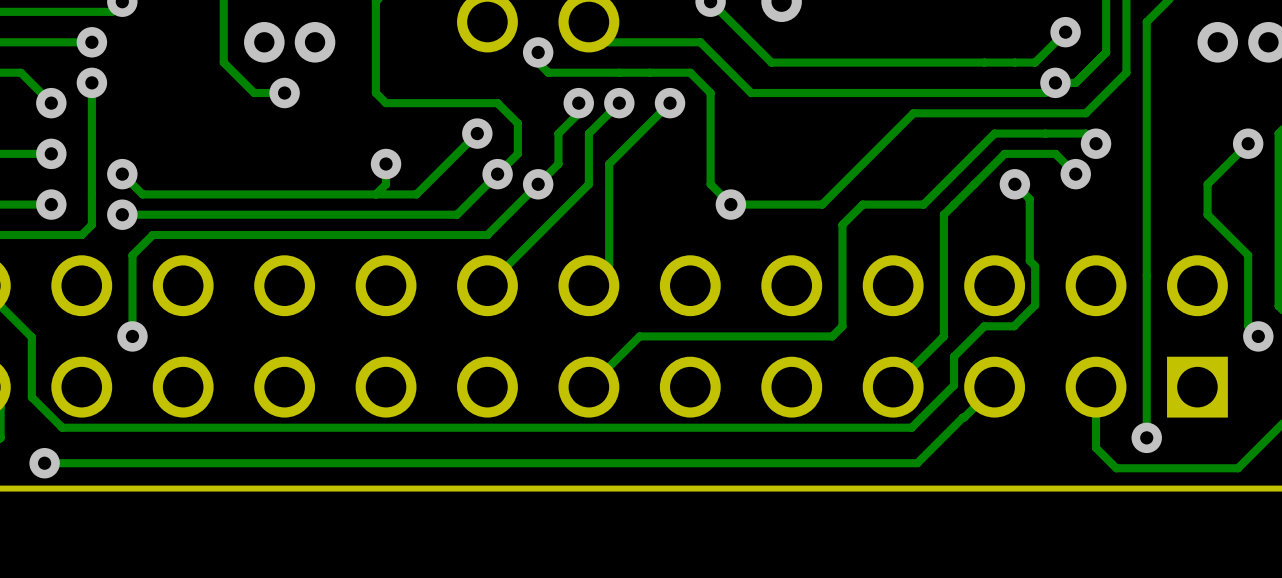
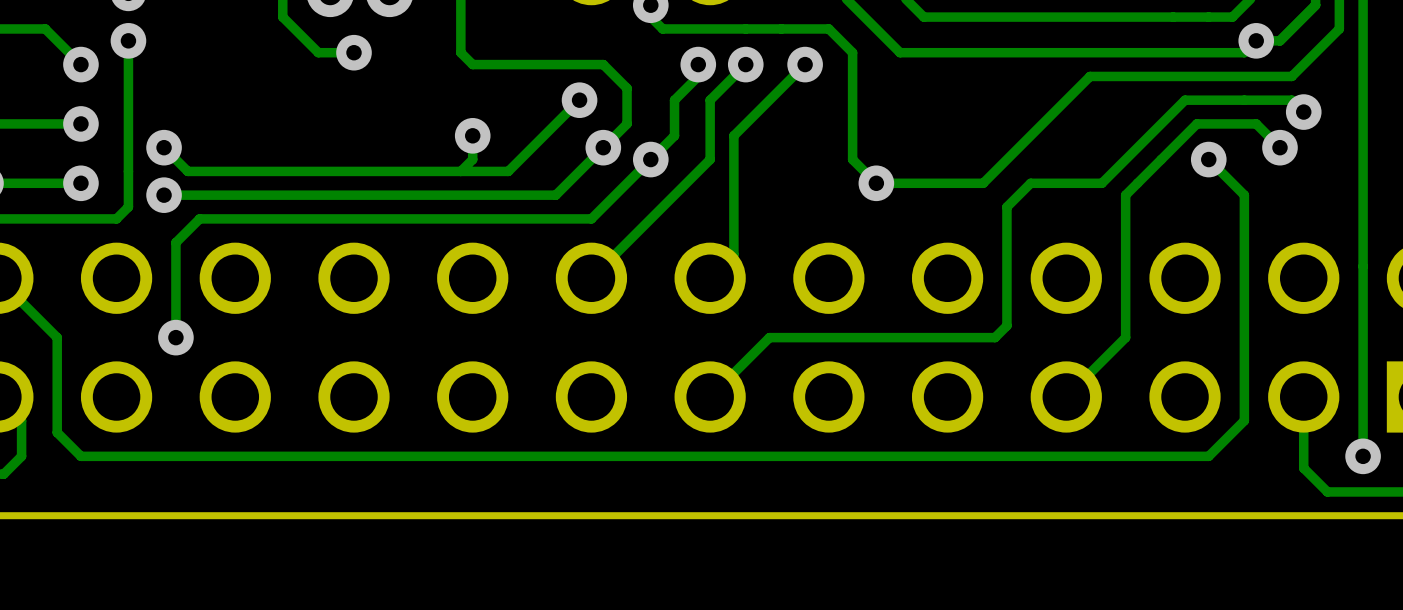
track: (1029, 199) (1029, 260) (1035, 266) (1035, 305) (1014, 326) (984, 326) (954, 356) (954, 385) (911, 427) (62, 427) (31, 397) (31, 336) -> (1226, 176) (1244, 195) (1244, 420) (1208, 456) (80, 456) (57, 432) (57, 337)
track: (994, 387) (917, 463) (44, 463) -> none
via: (44, 463) -> none

